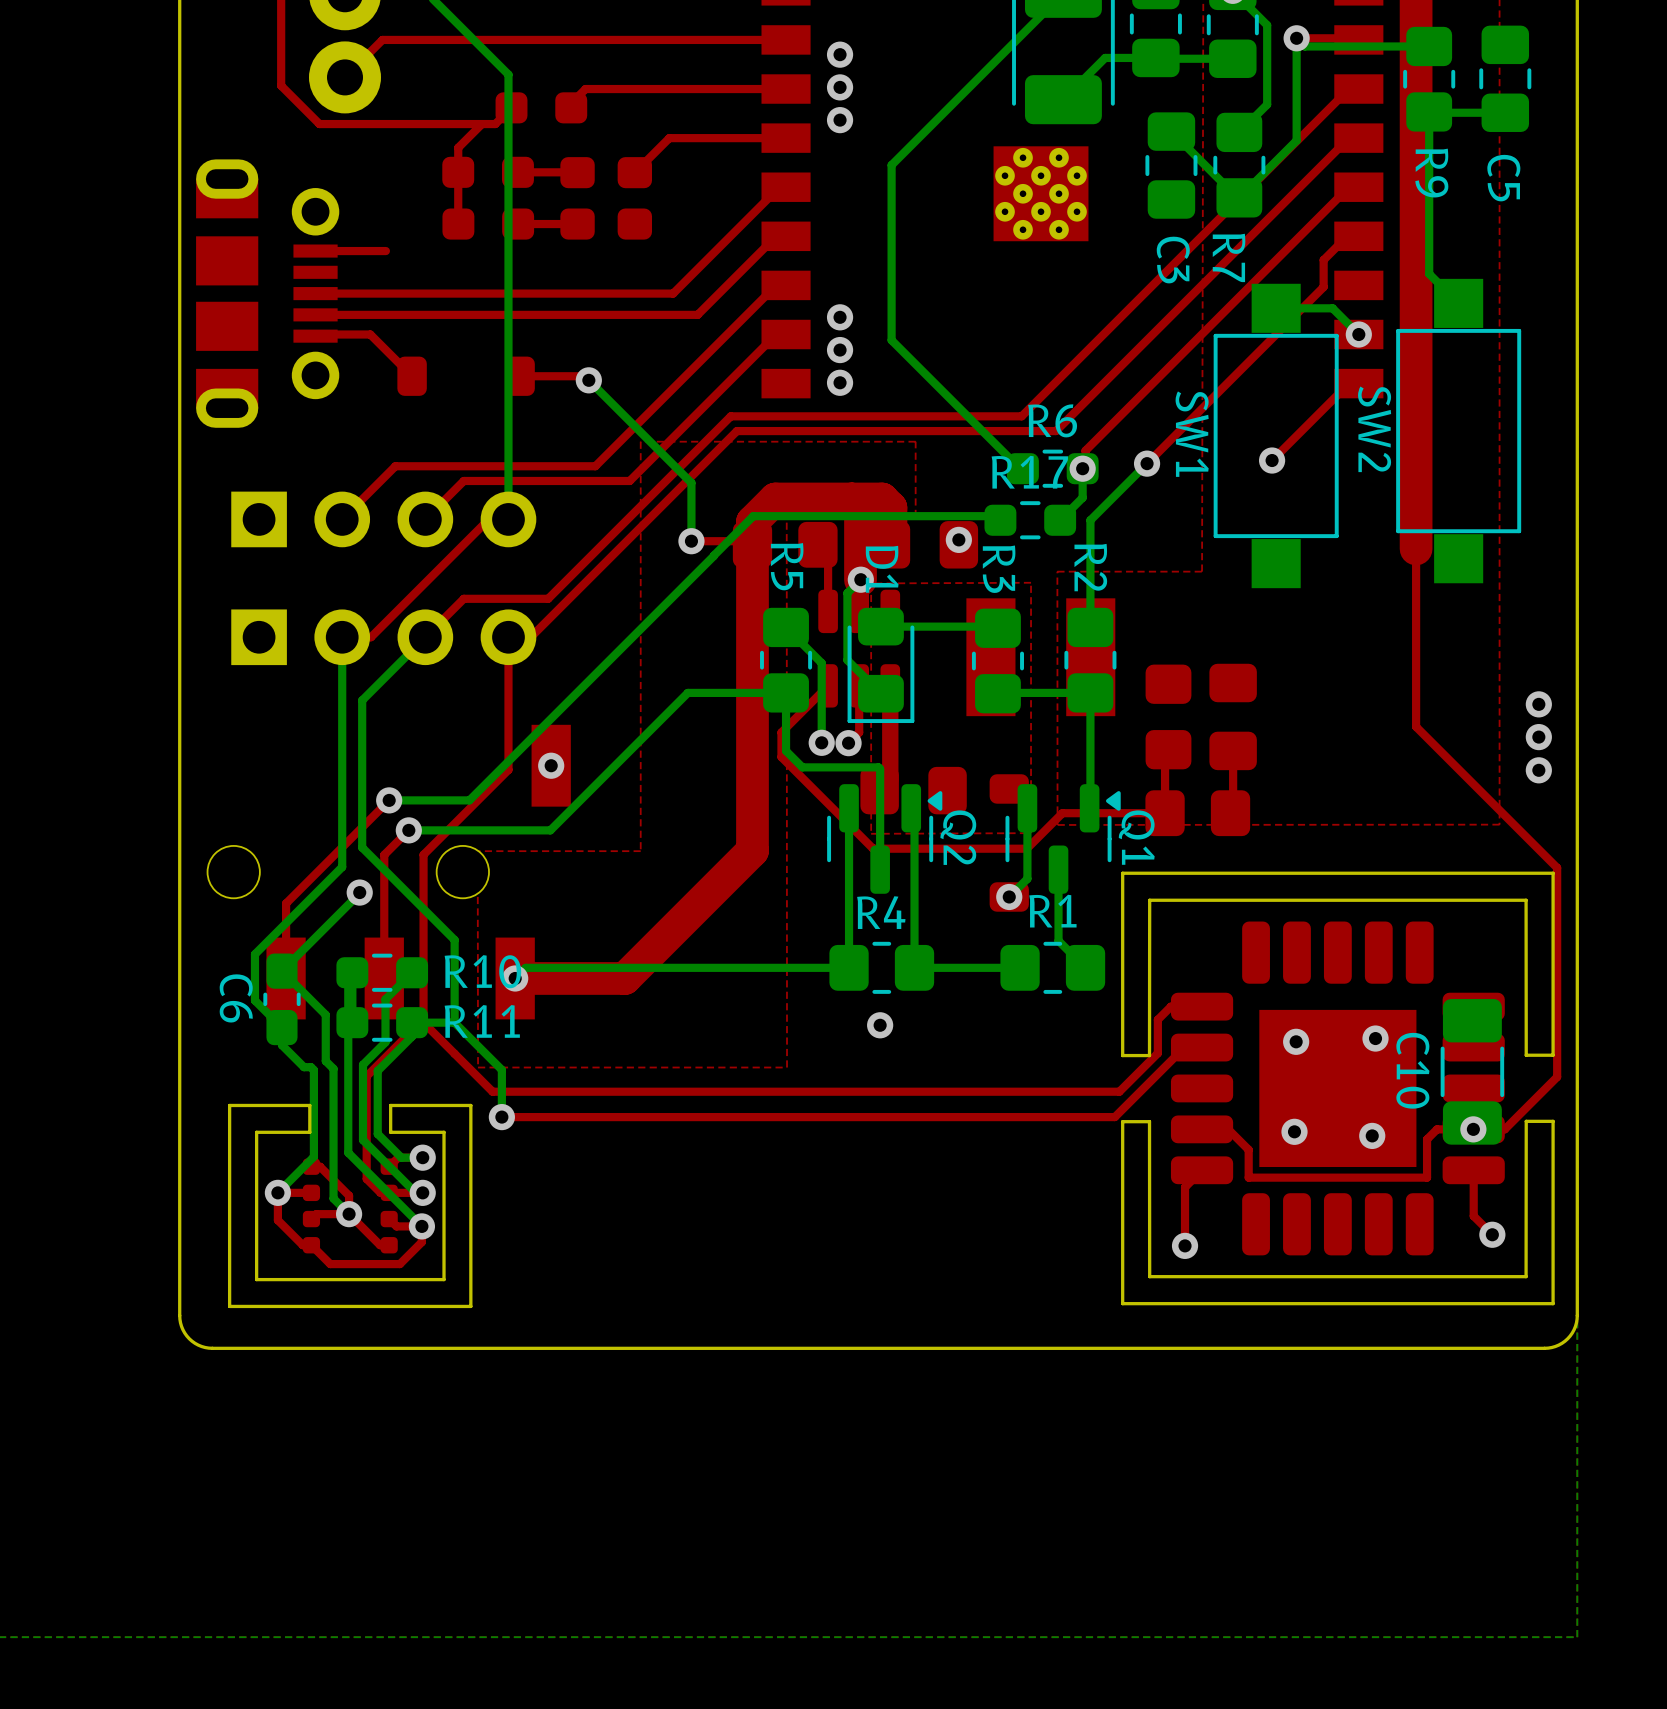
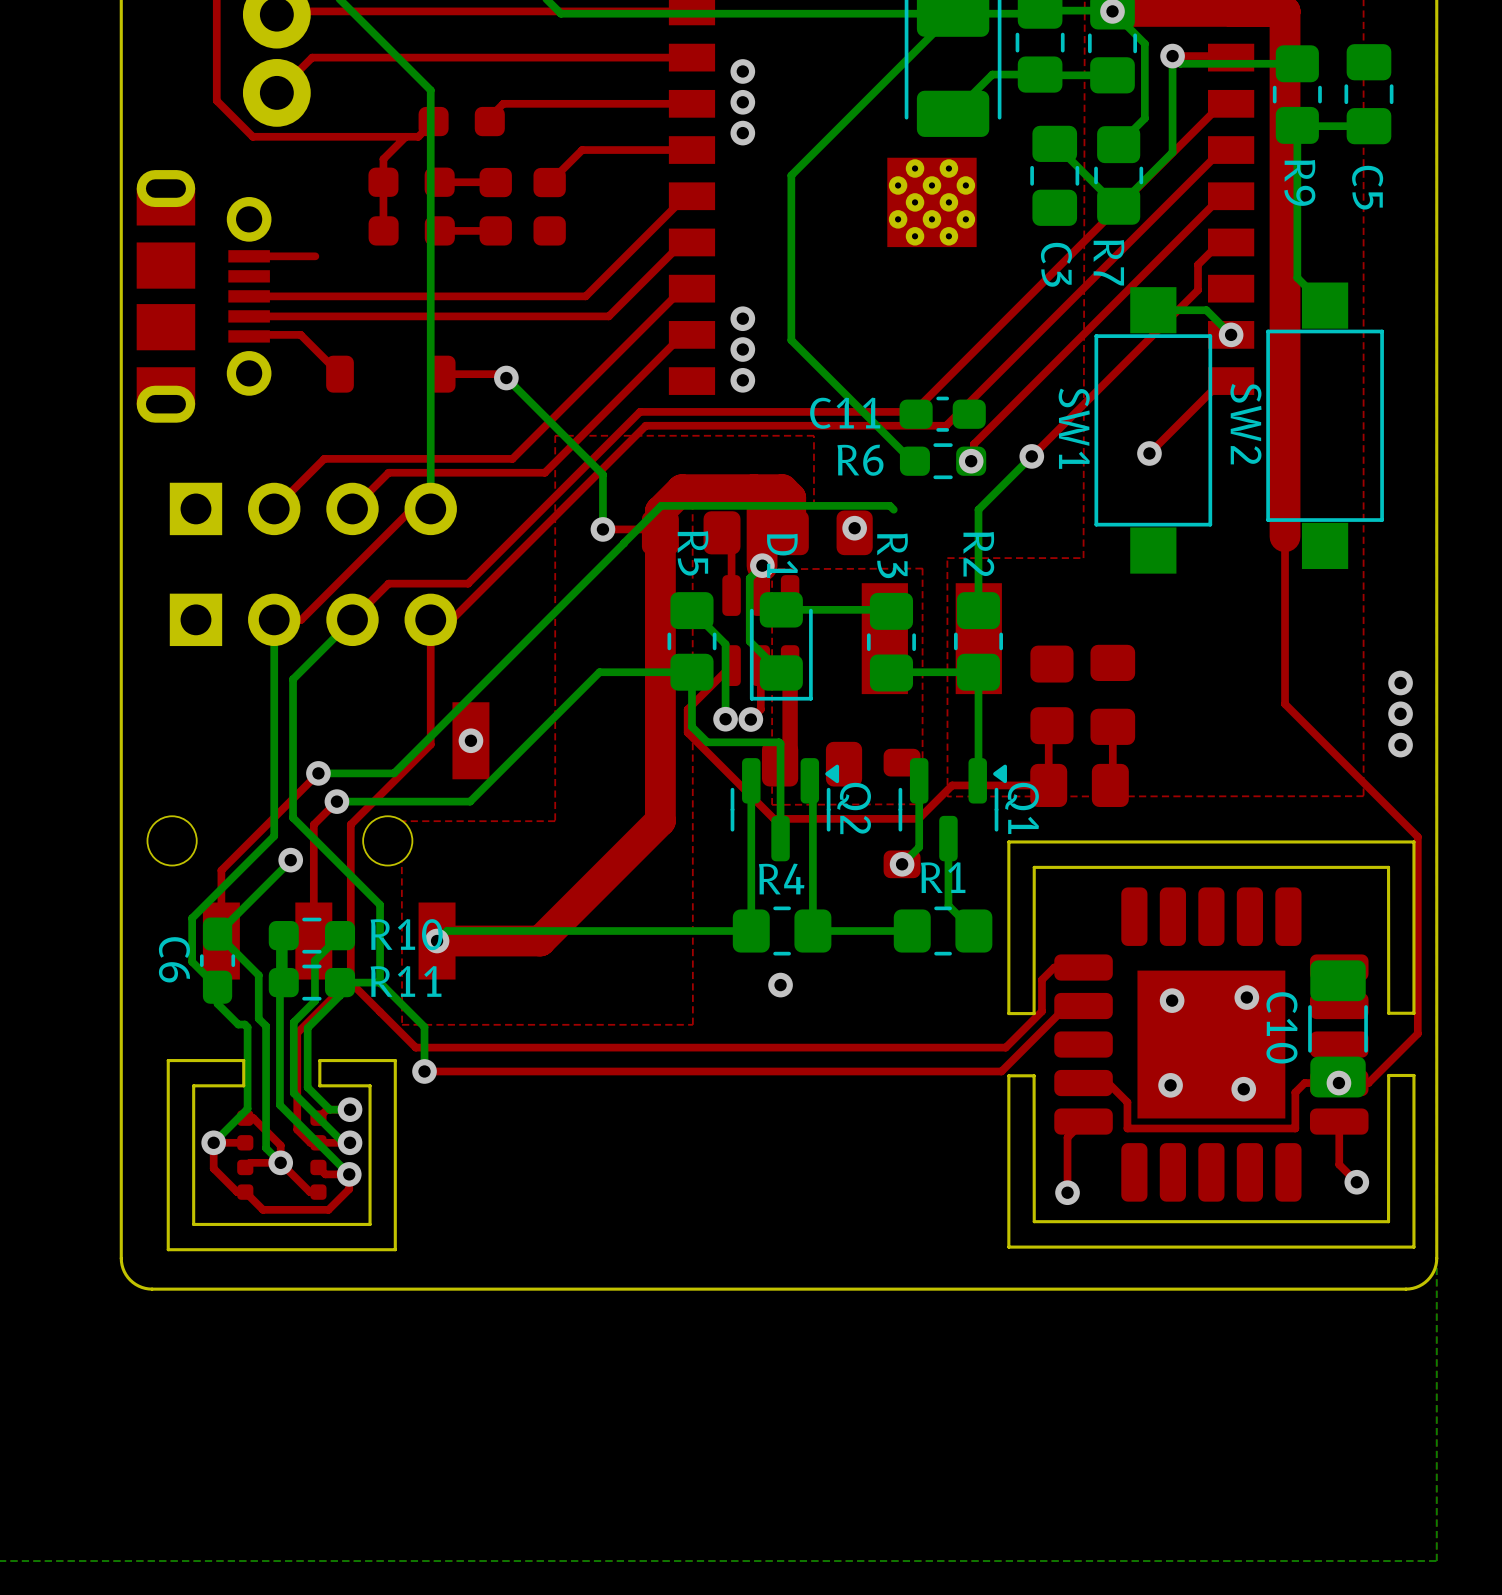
C11: none -> (942, 414)
R6 name position: R6 (1052, 420) -> R6 (860, 460)
bottom track: (1082, 468) (1082, 497) (1060, 520) -> none
R17: (1030, 520) -> none

